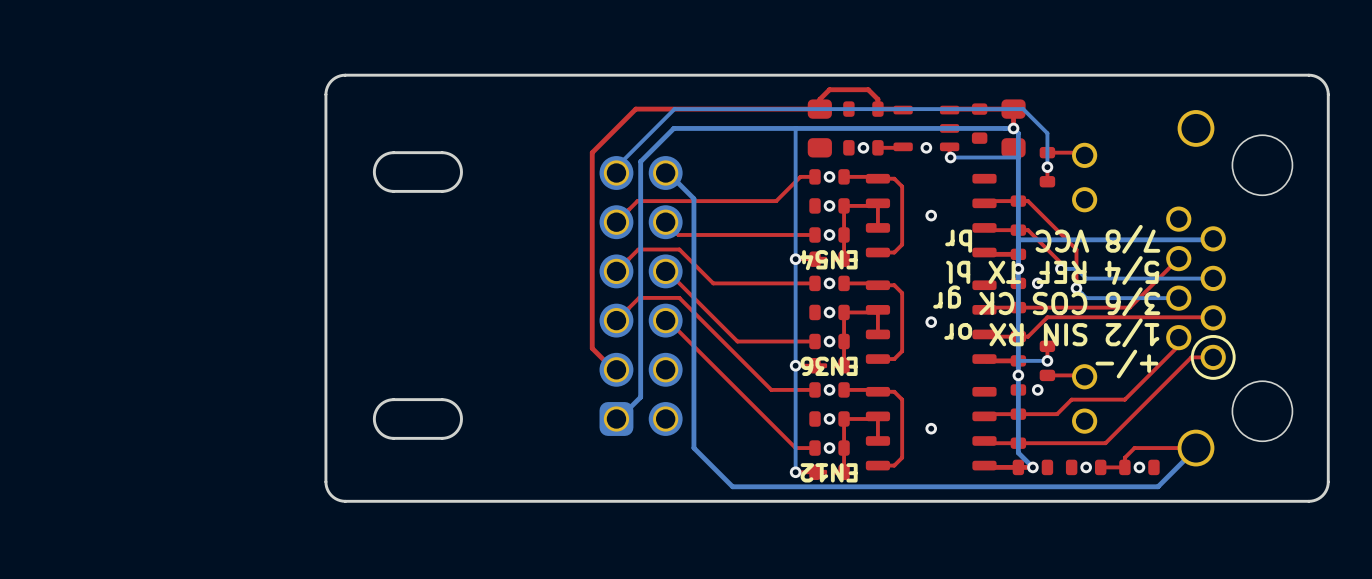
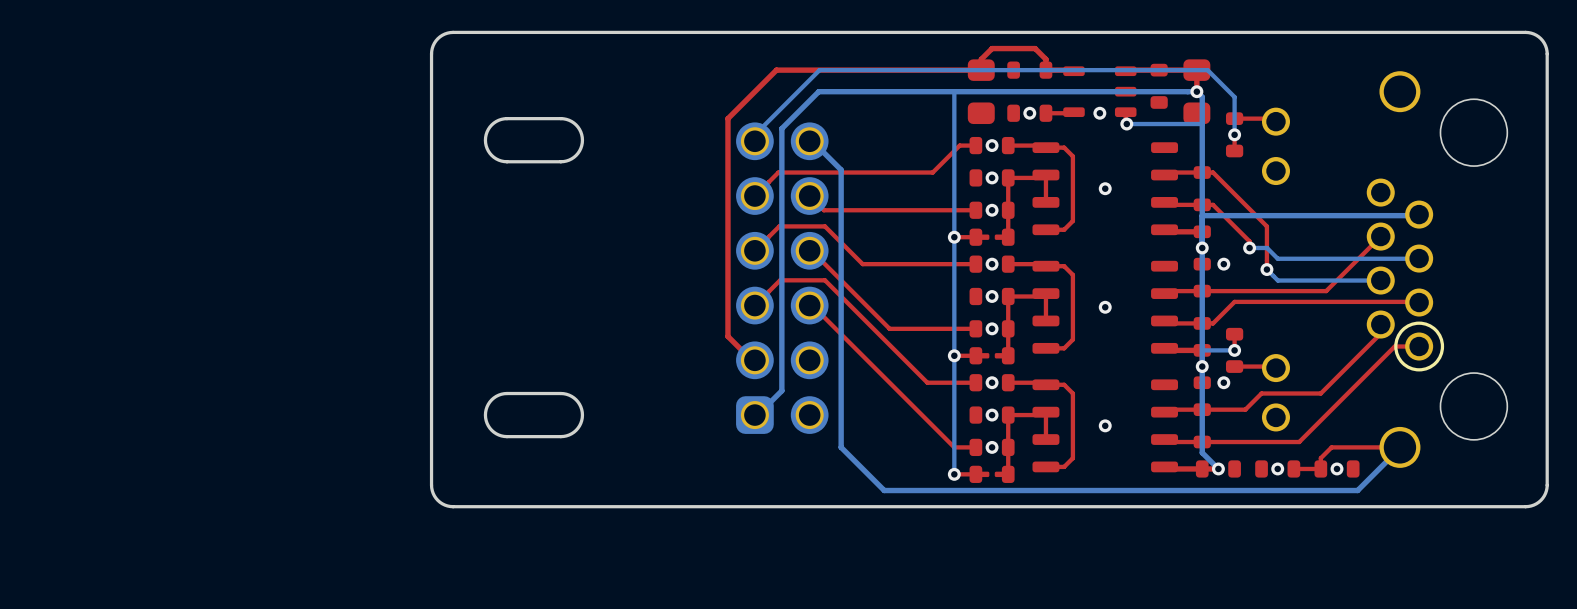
text: 7/8 VCC br (1052, 239) -> none
text: EN54 (828, 260) -> none
text: 5/4 REF TX bl (1052, 270) -> none
text: 3/6 COS CK gr (1046, 300) -> none
text: 1/2 SIN RX or (1051, 332) -> none
text: +/- (1126, 364) -> none
text: EN36 (829, 366) -> none
text: EN12 (829, 472) -> none

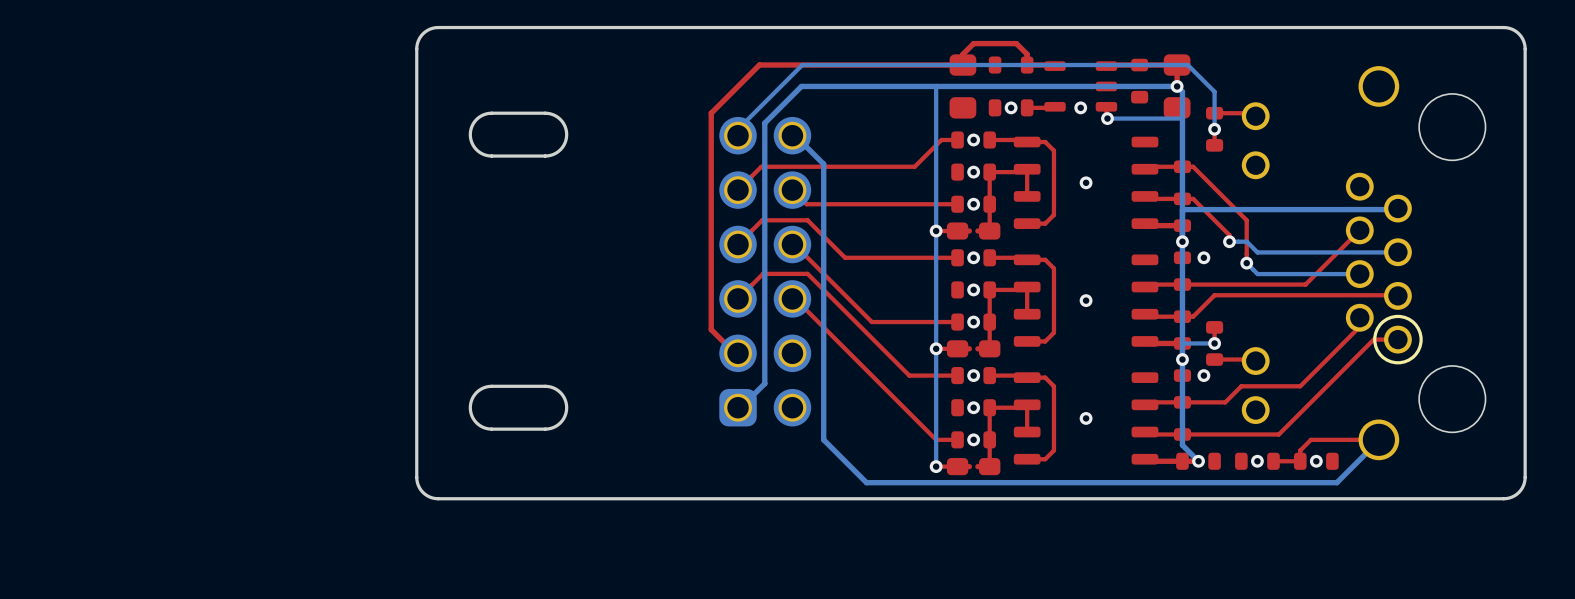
part footprint: [969, 228, 1015, 246] -> [946, 222, 1001, 240]
part footprint: [969, 347, 1015, 365] -> [946, 340, 1001, 358]
part footprint: [969, 465, 1015, 483] -> [946, 458, 1001, 476]

